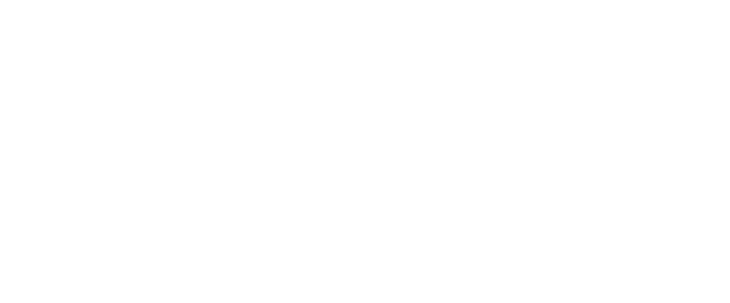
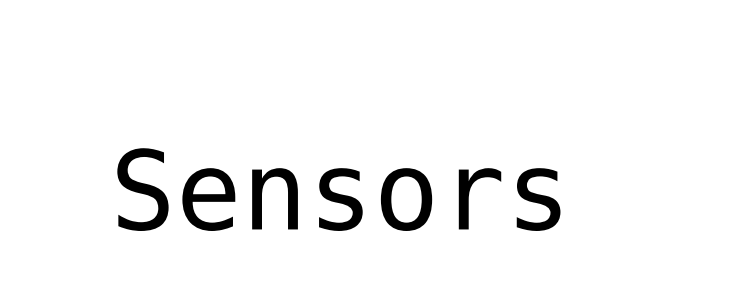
text: none -> Sensors (338, 189)

